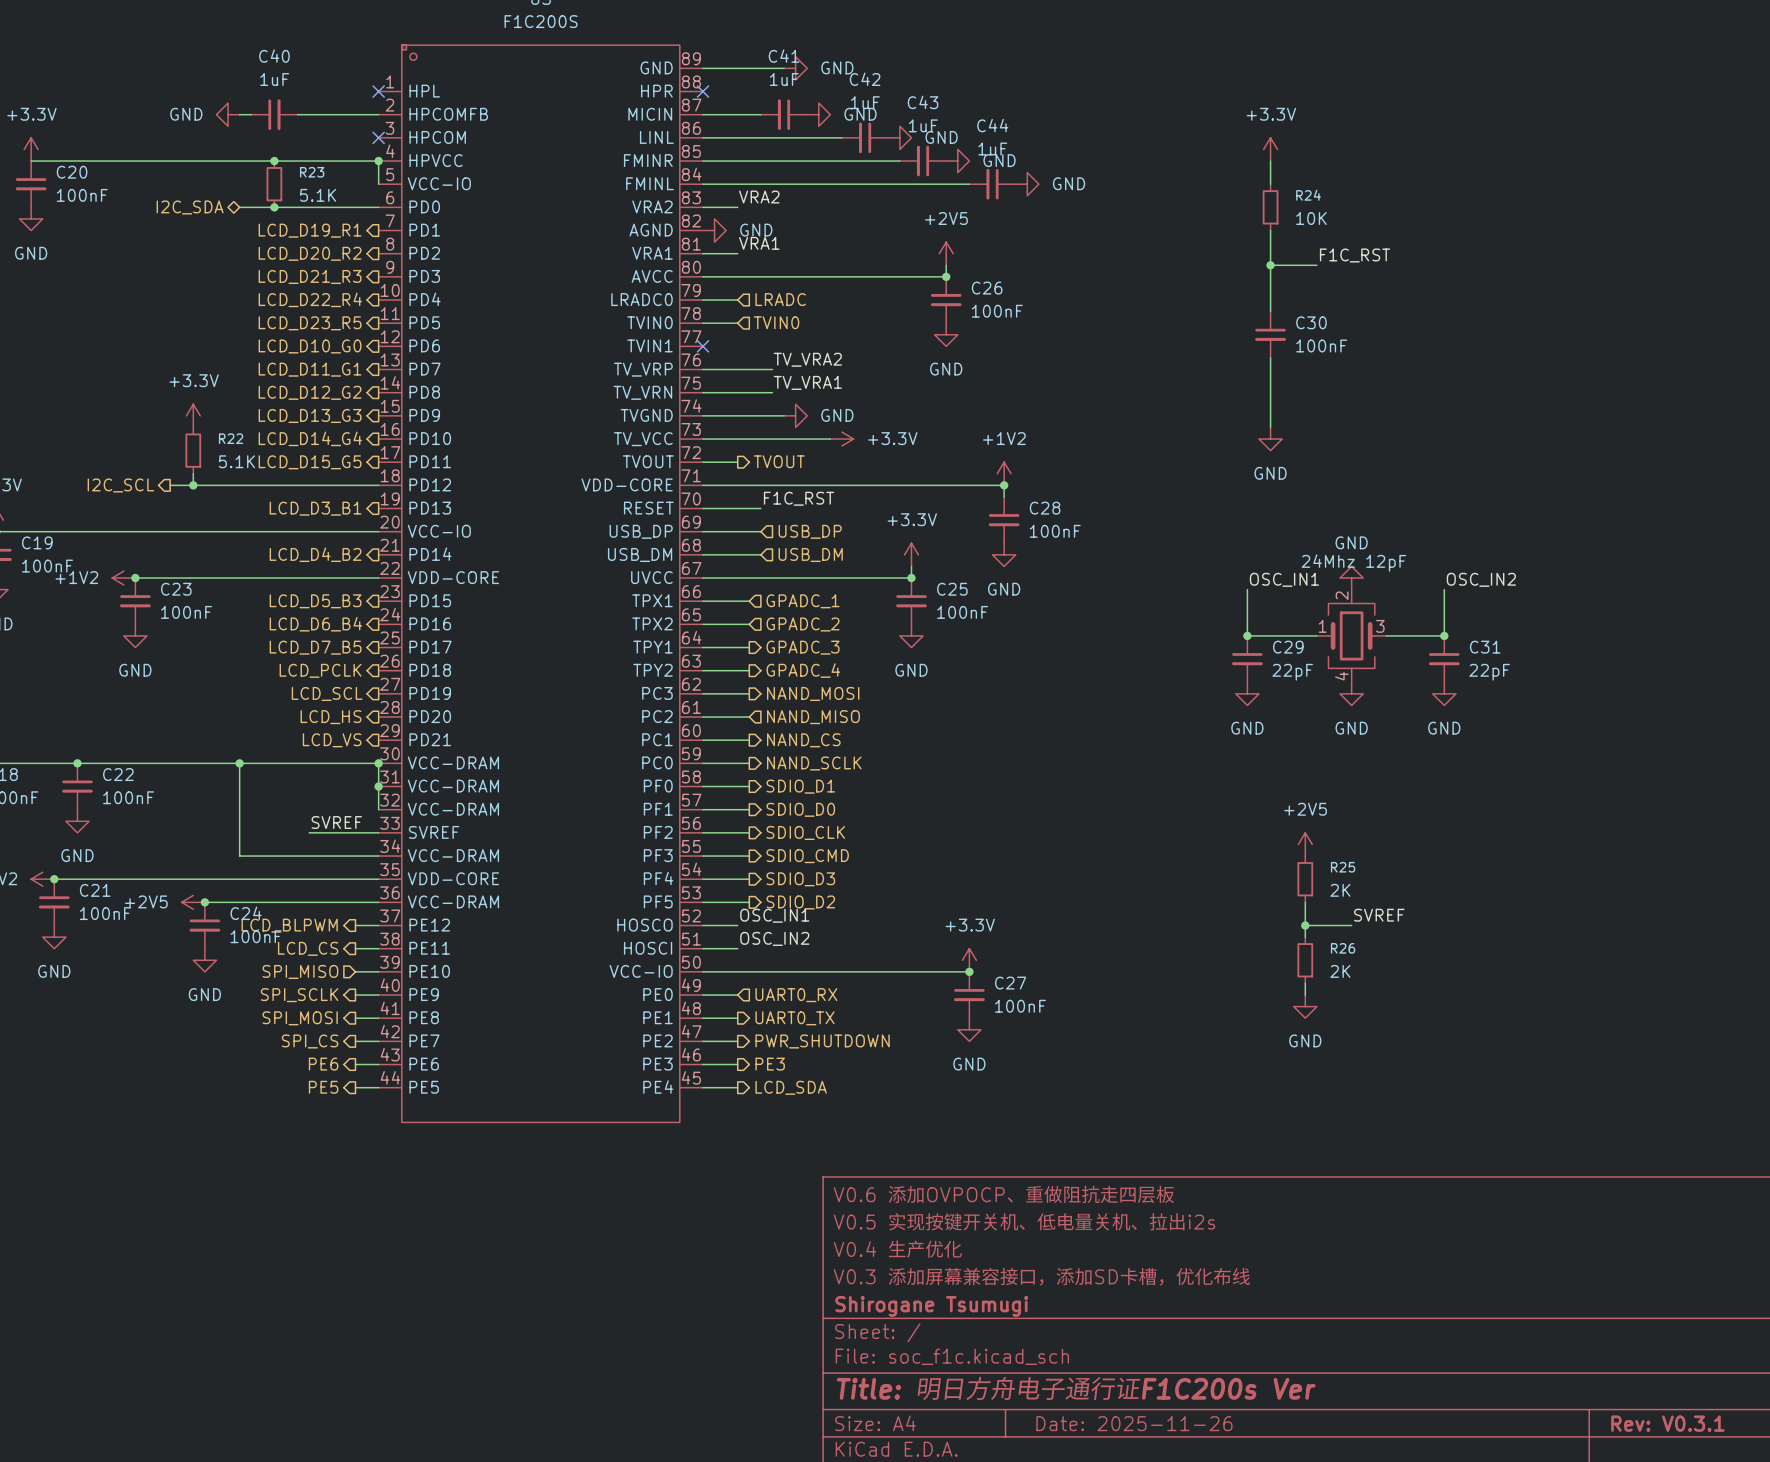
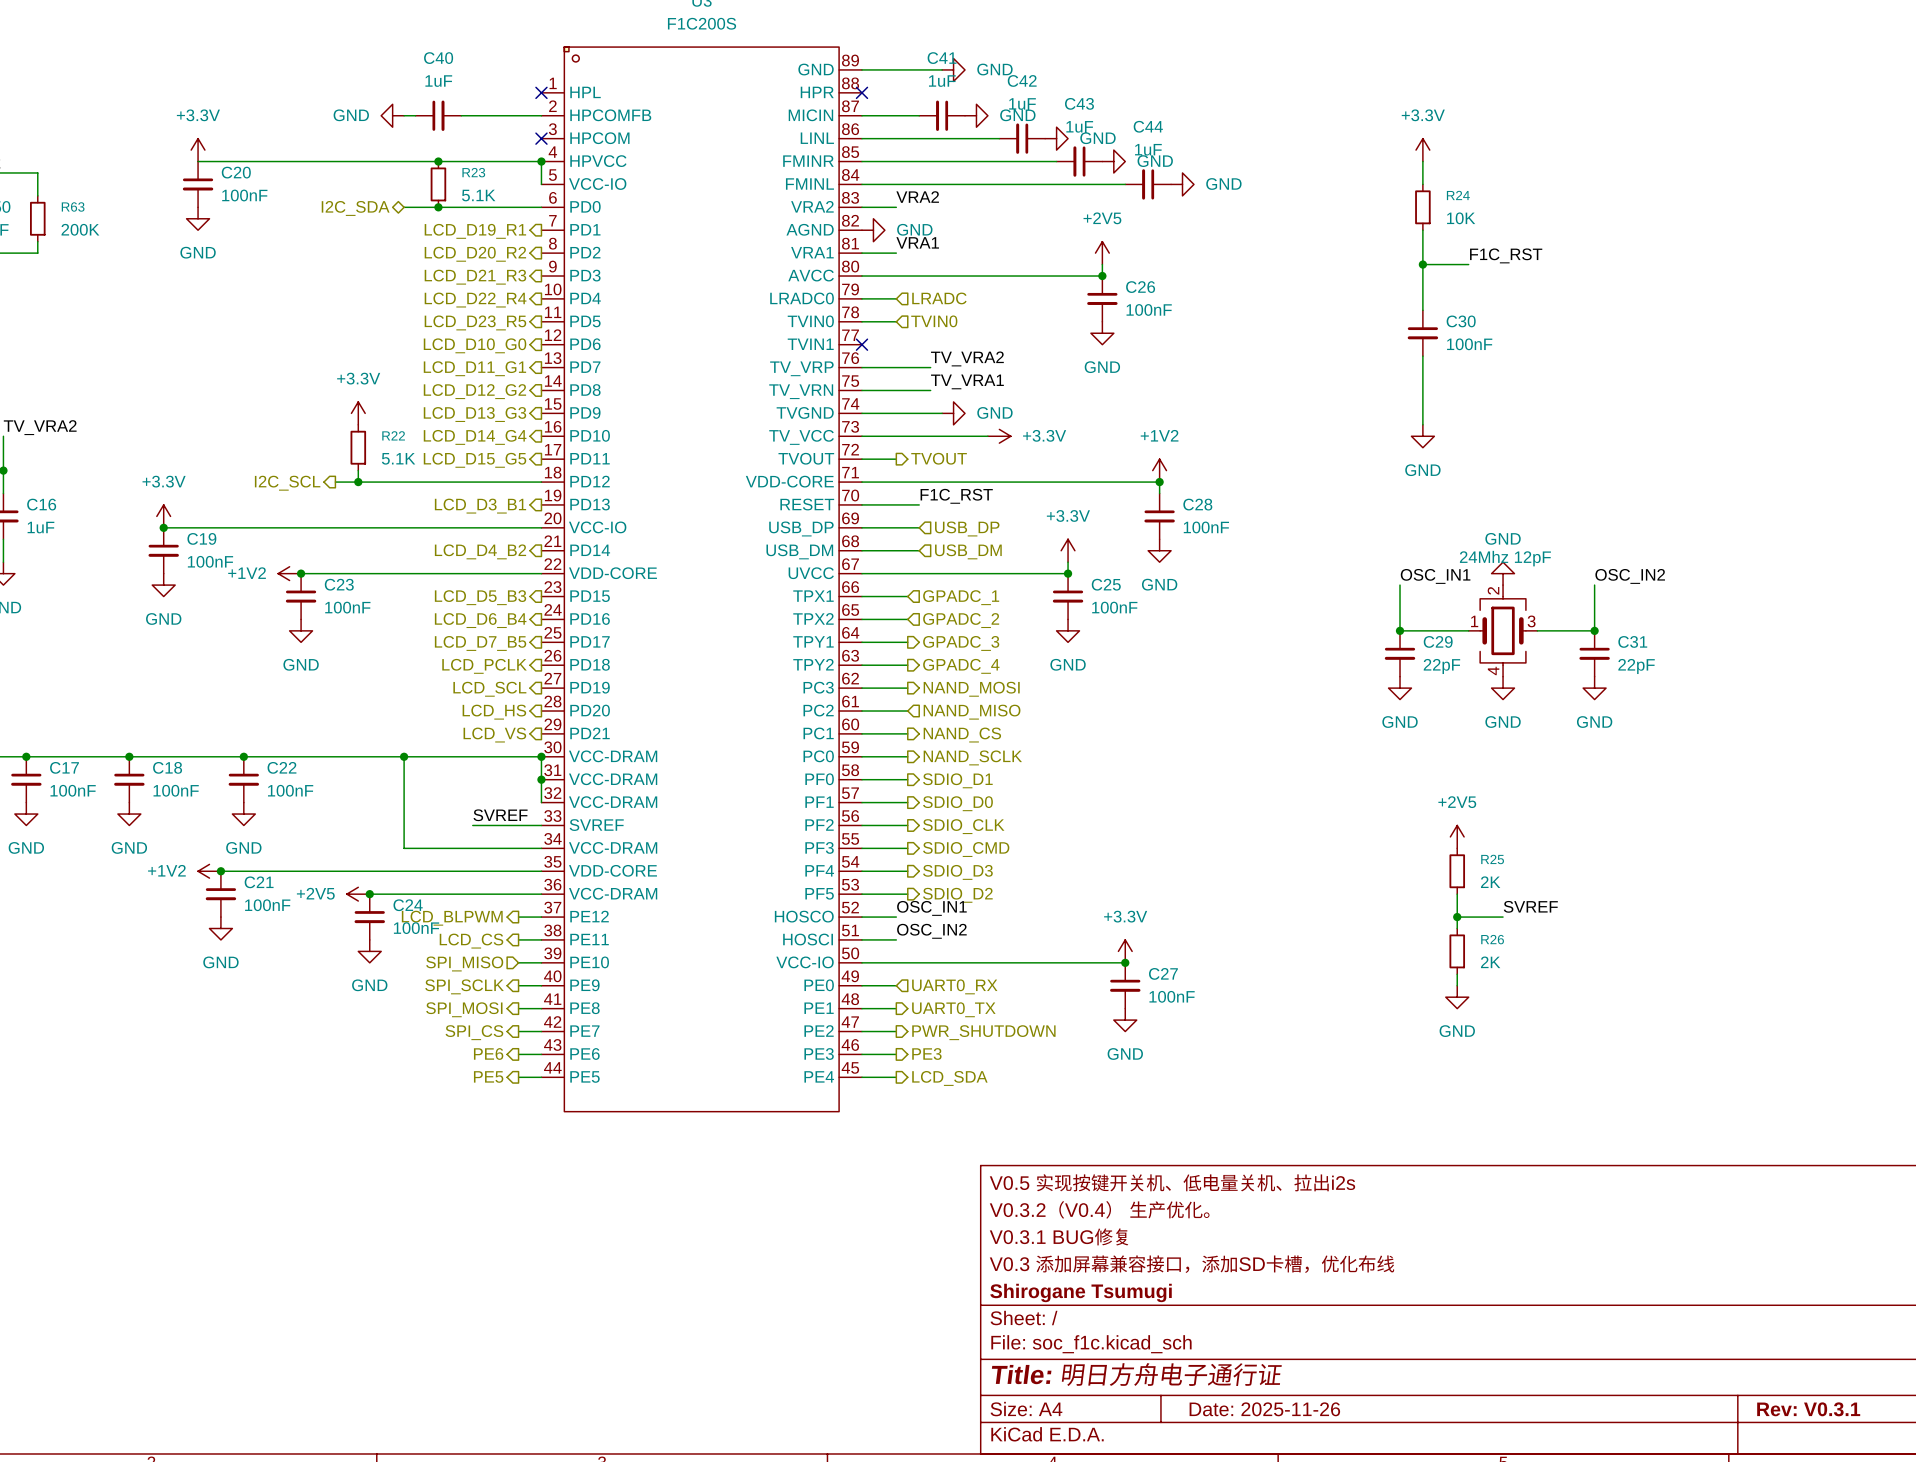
title block: V0.6 添加OVPOCP、重做阻抗走四层板 (1004, 1194) -> V0.5 实现按键开关机、低电量关机、拉出i2s (1172, 1182)
title block: V0.5 实现按键开关机、低电量关机、拉出i2s (1024, 1221) -> V0.3.2（V0.4） 生产优化。 (1099, 1209)
title block: V0.4 生产优化 (898, 1249) -> V0.3.1 BUG修复 (1059, 1236)
title block: Title: 明日方舟电子通行证F1C200s Ver (1076, 1388) -> Title: 明日方舟电子通行证 (1136, 1374)

